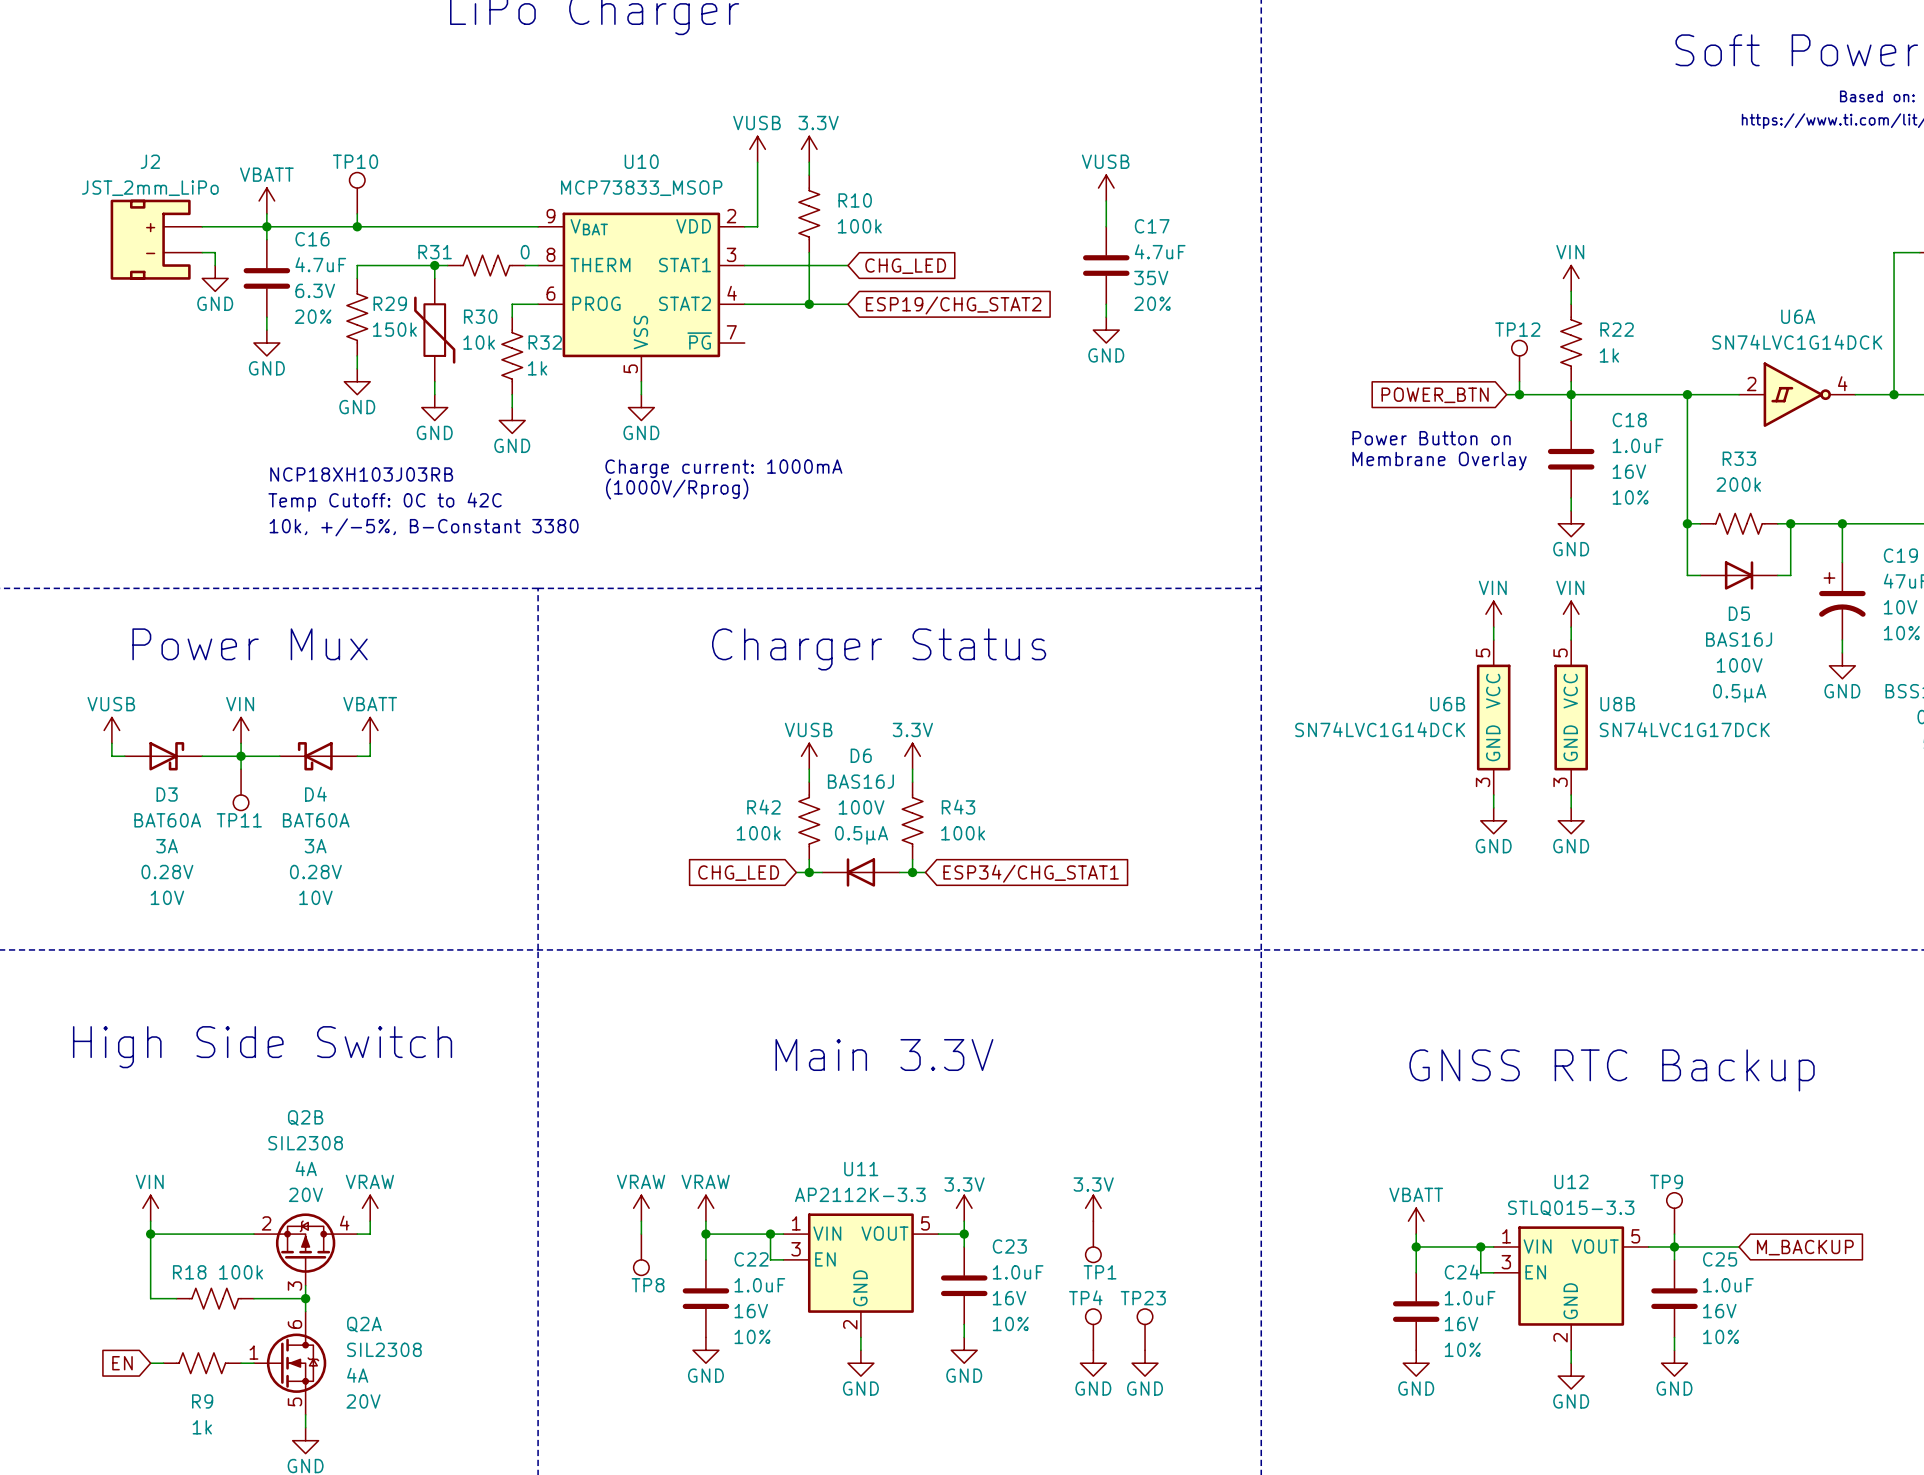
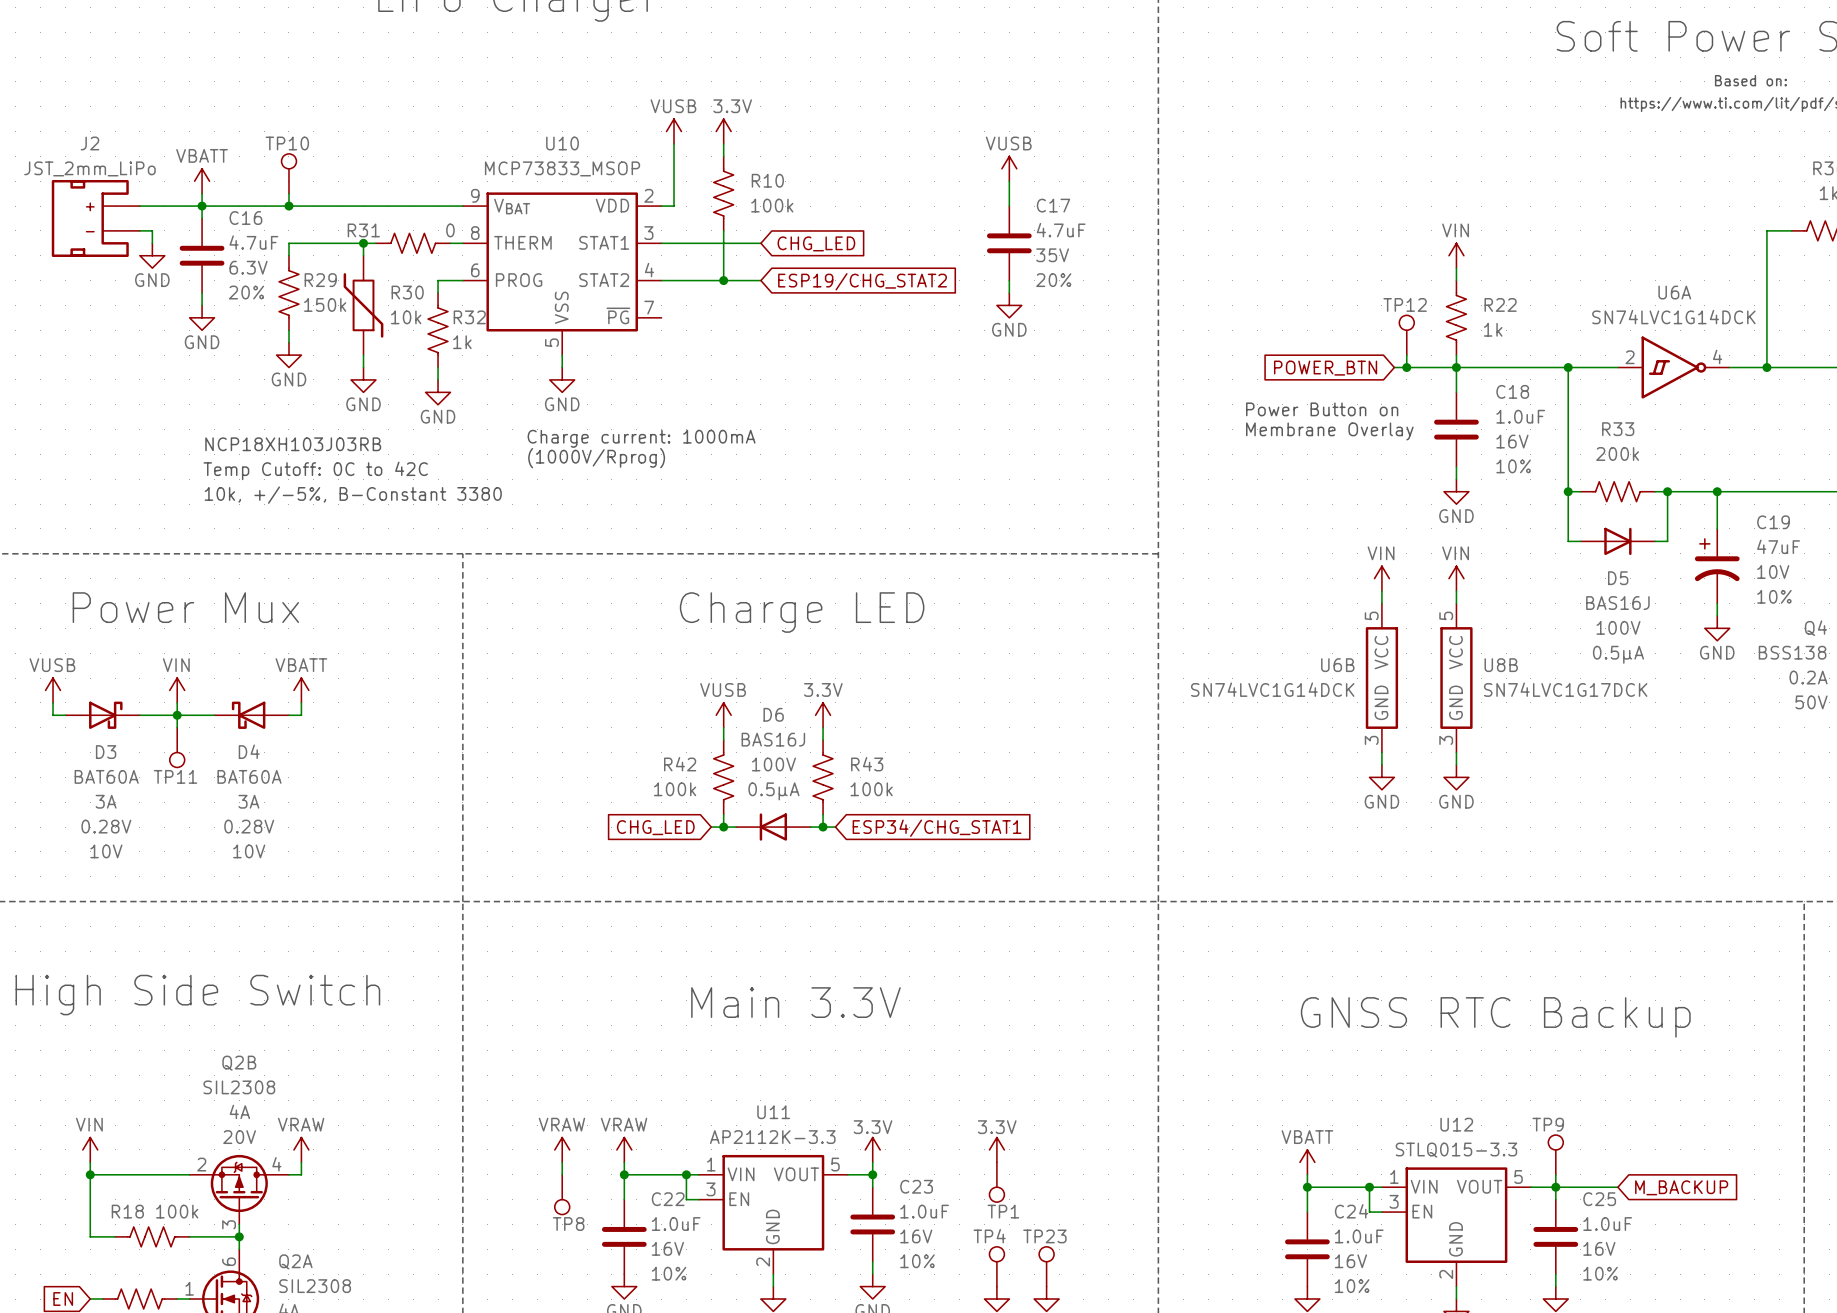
text: Charger Status (879, 649) -> none
text: none -> Charge LED (802, 612)

